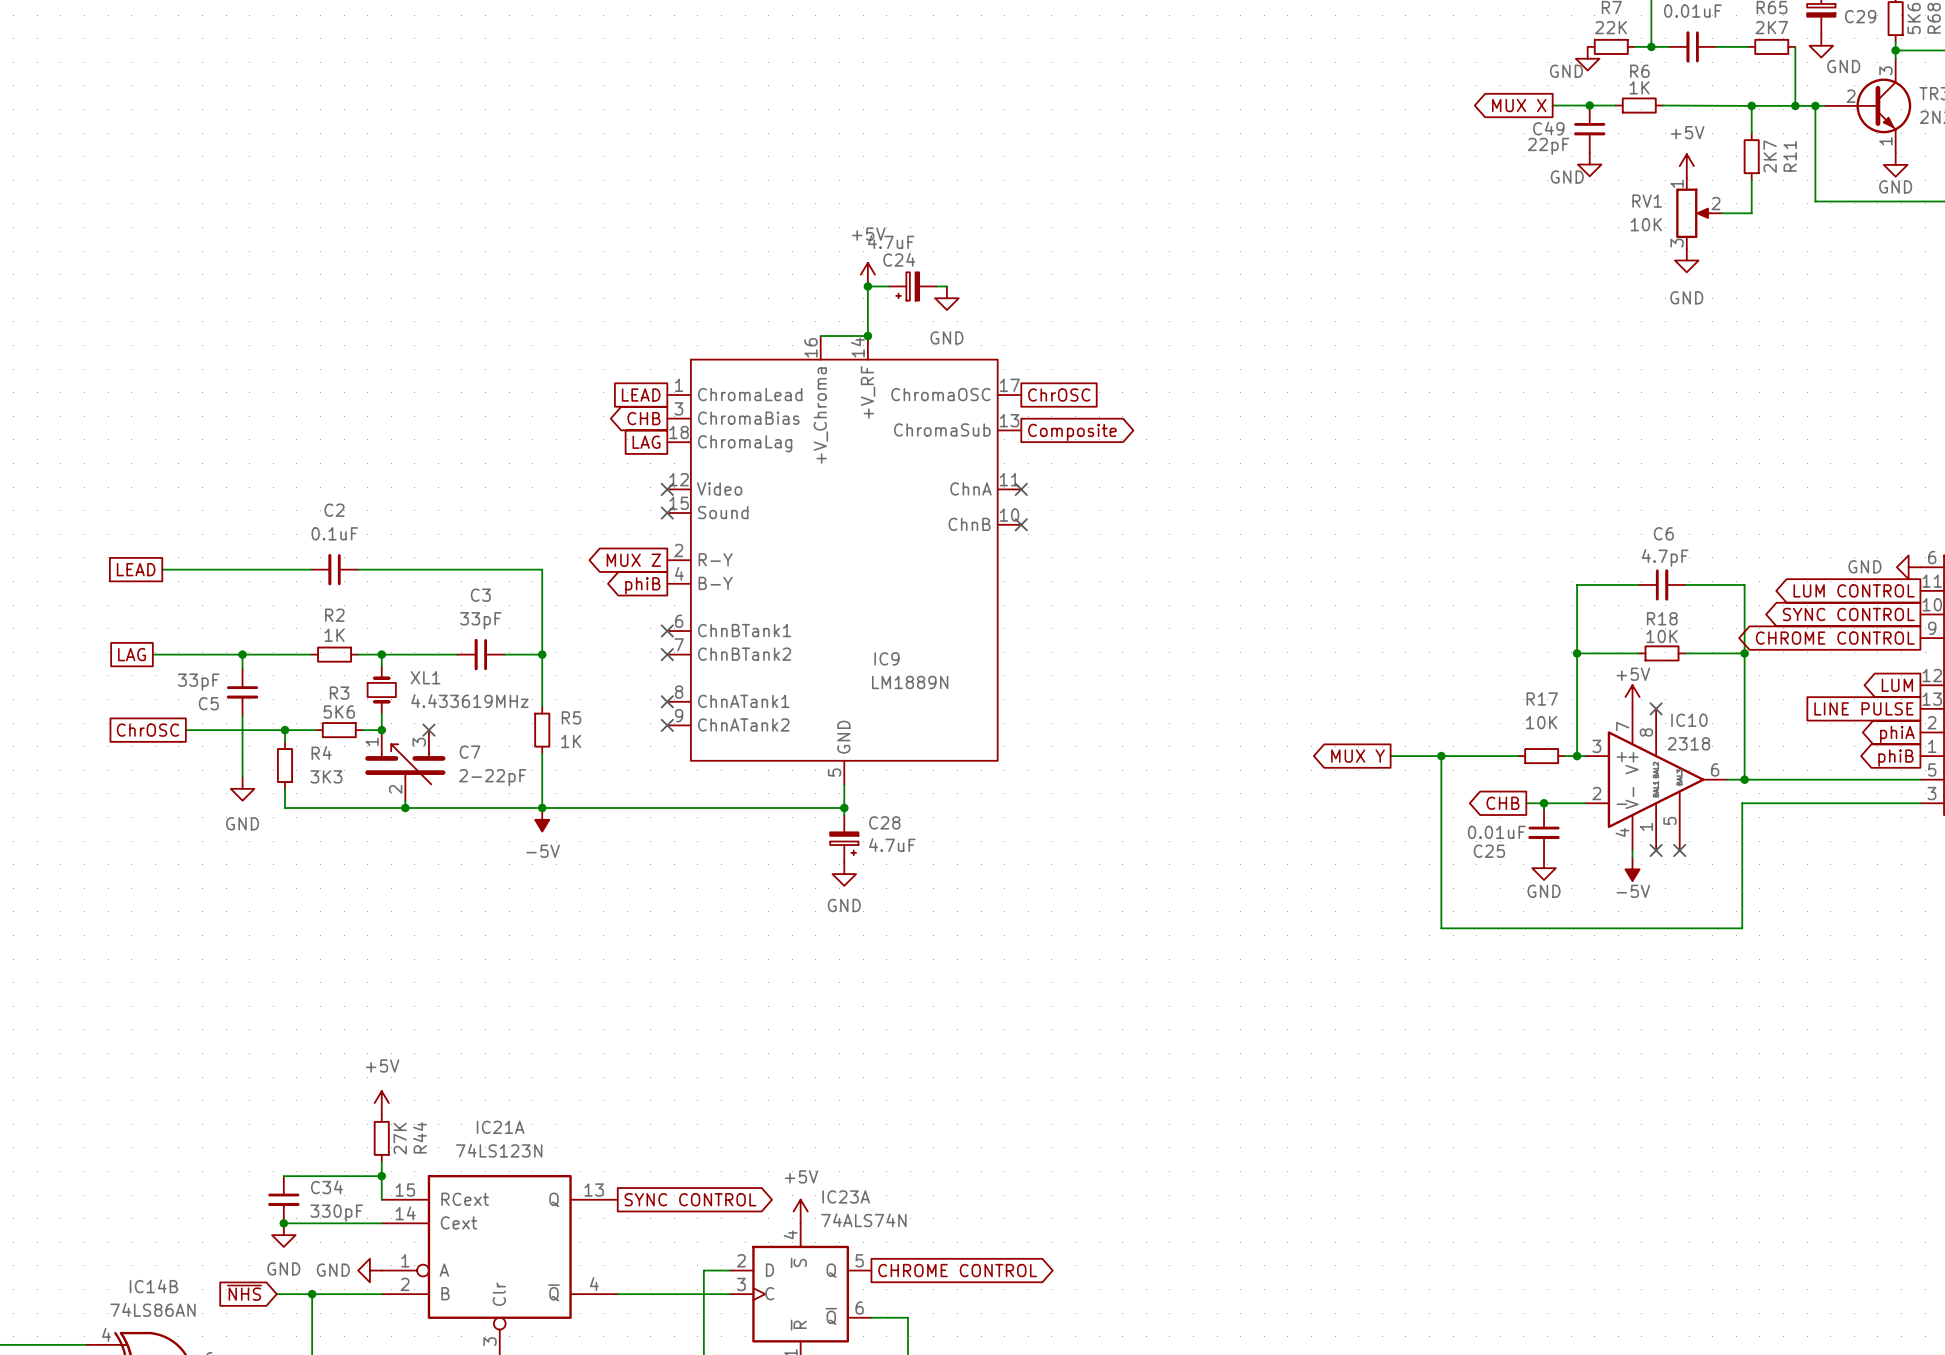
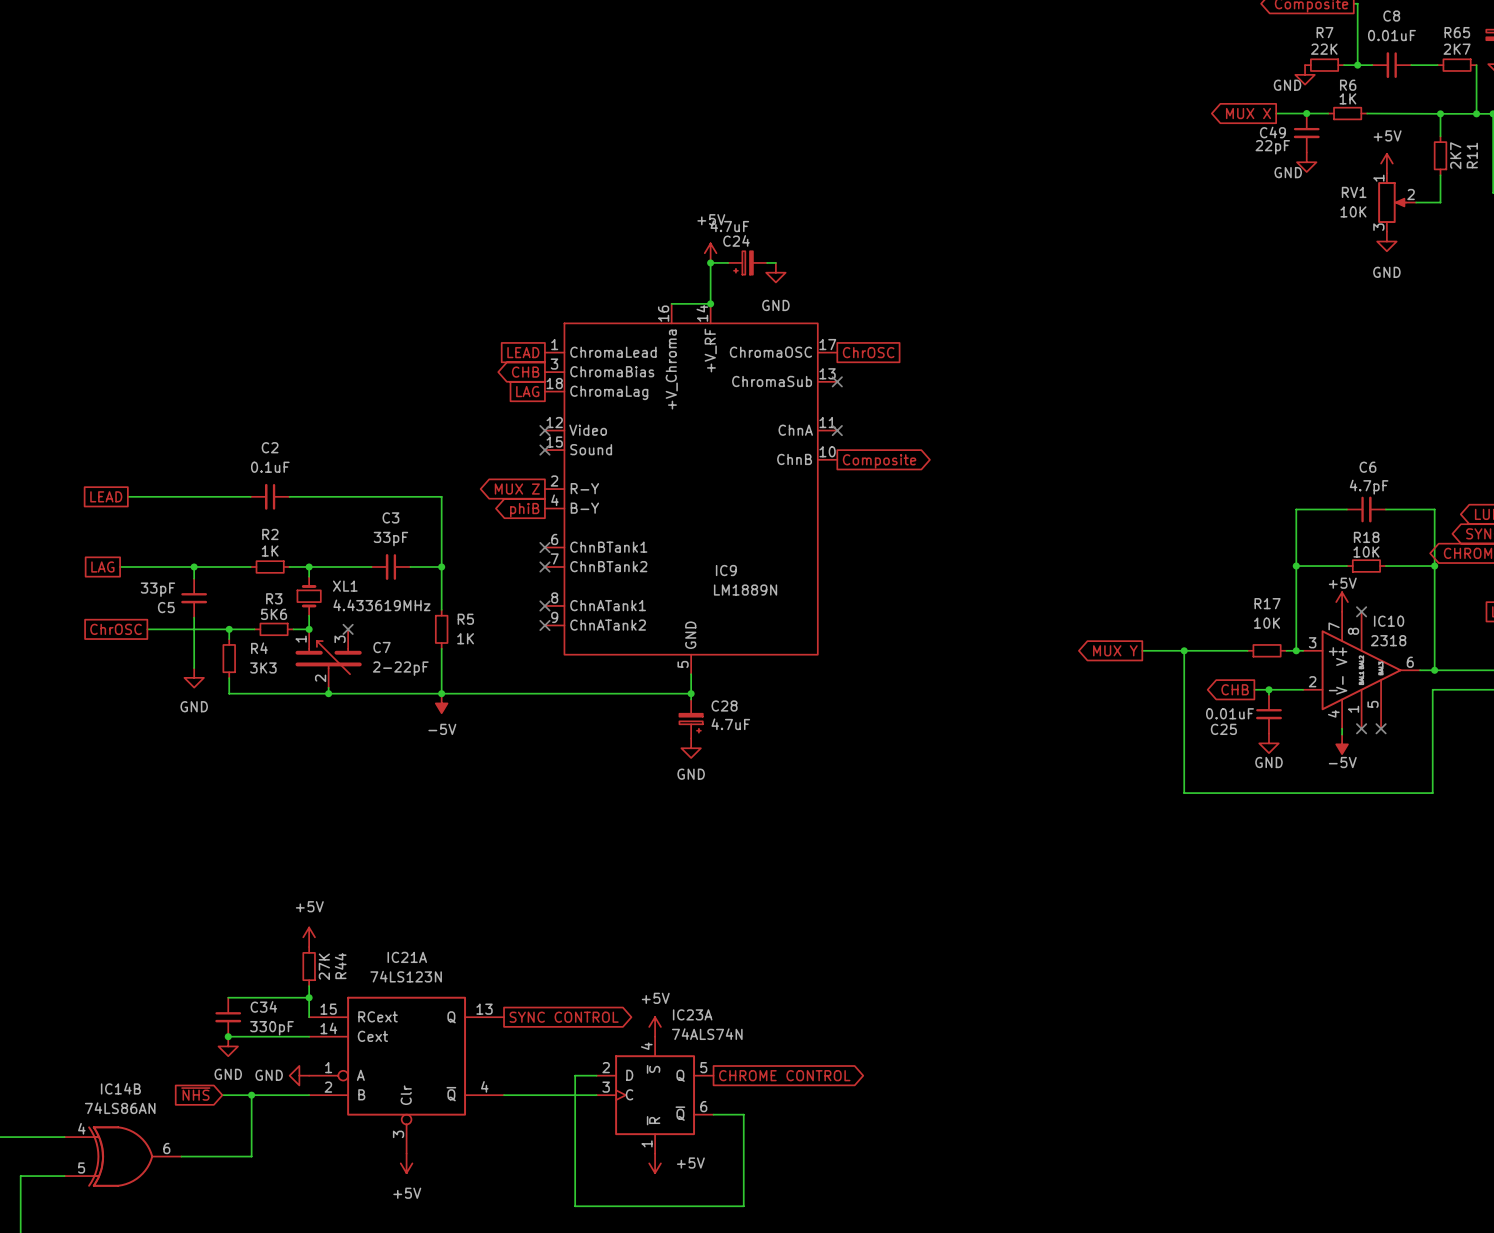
no-connect mark: none -> (837, 381)
global label position: Composite (1072, 432) -> Composite (879, 461)
no-connect mark: (1021, 524) -> none

